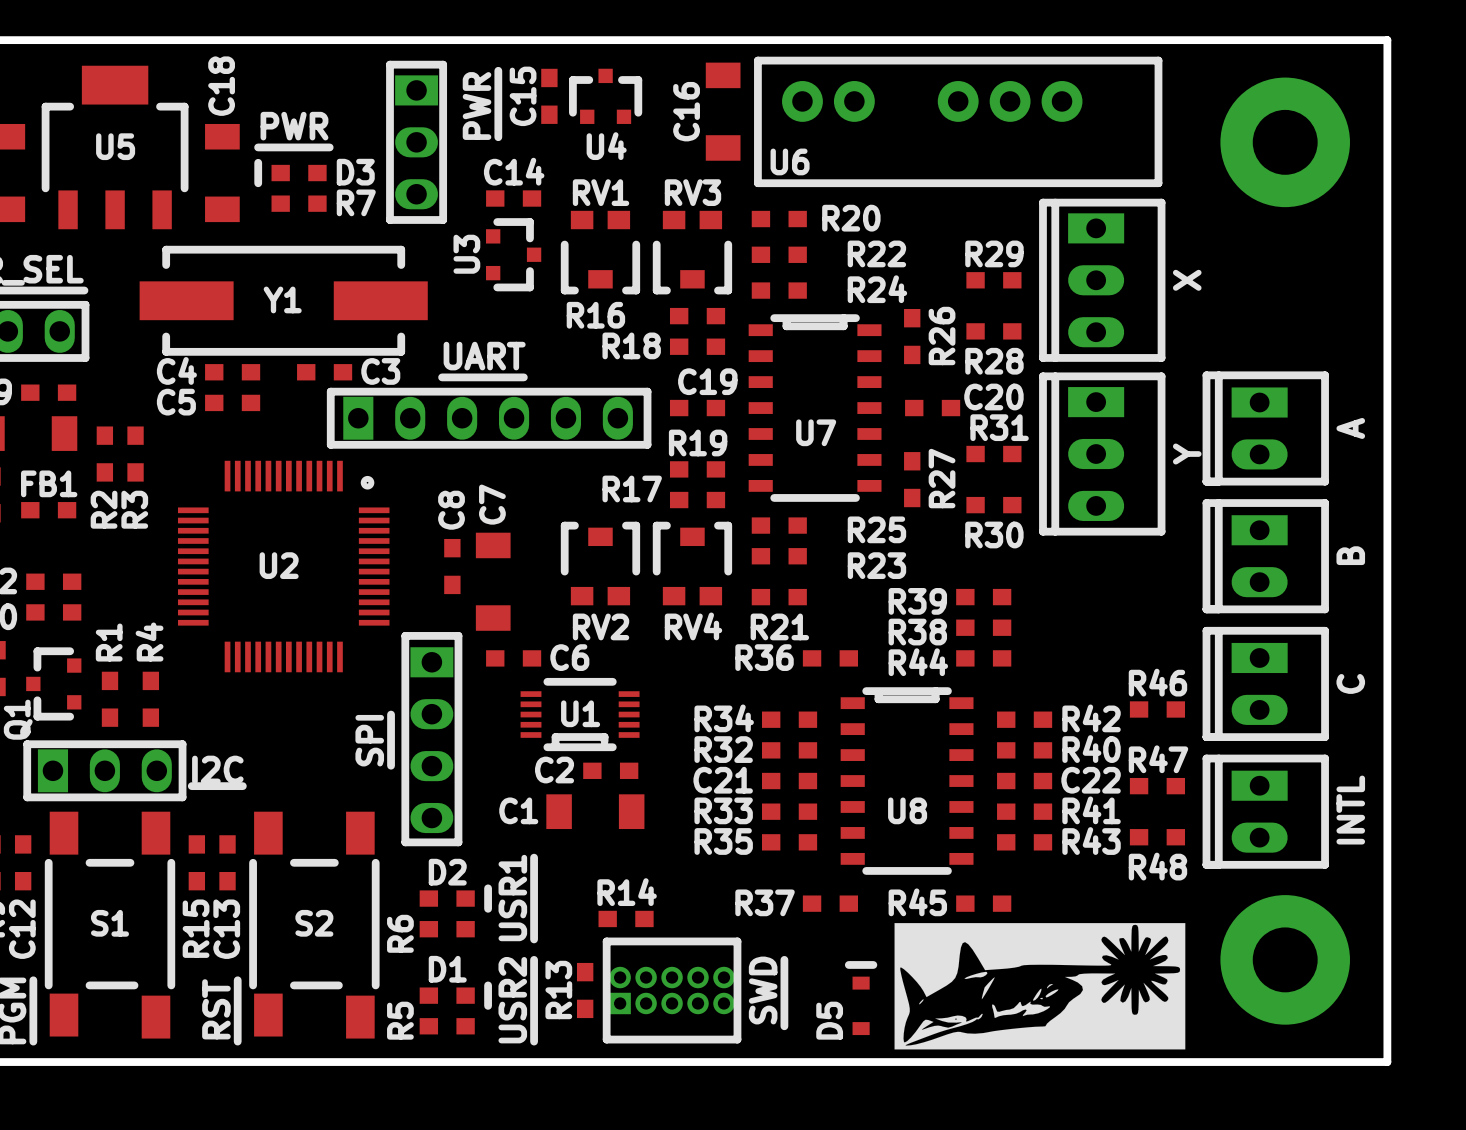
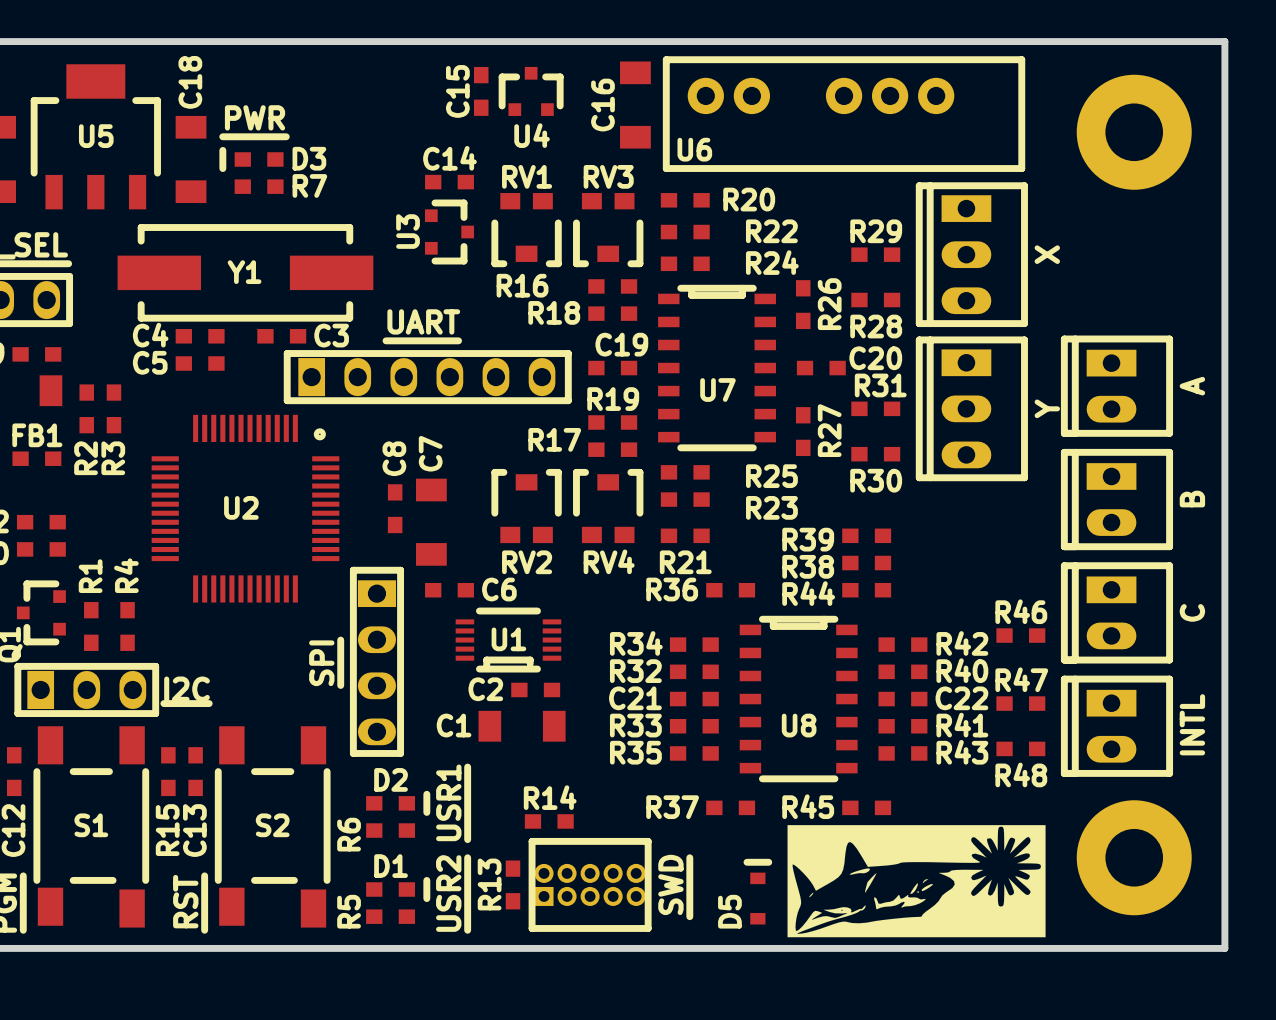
line: (498, 70) (498, 137) -> none
part: PWR (416, 142) -> none

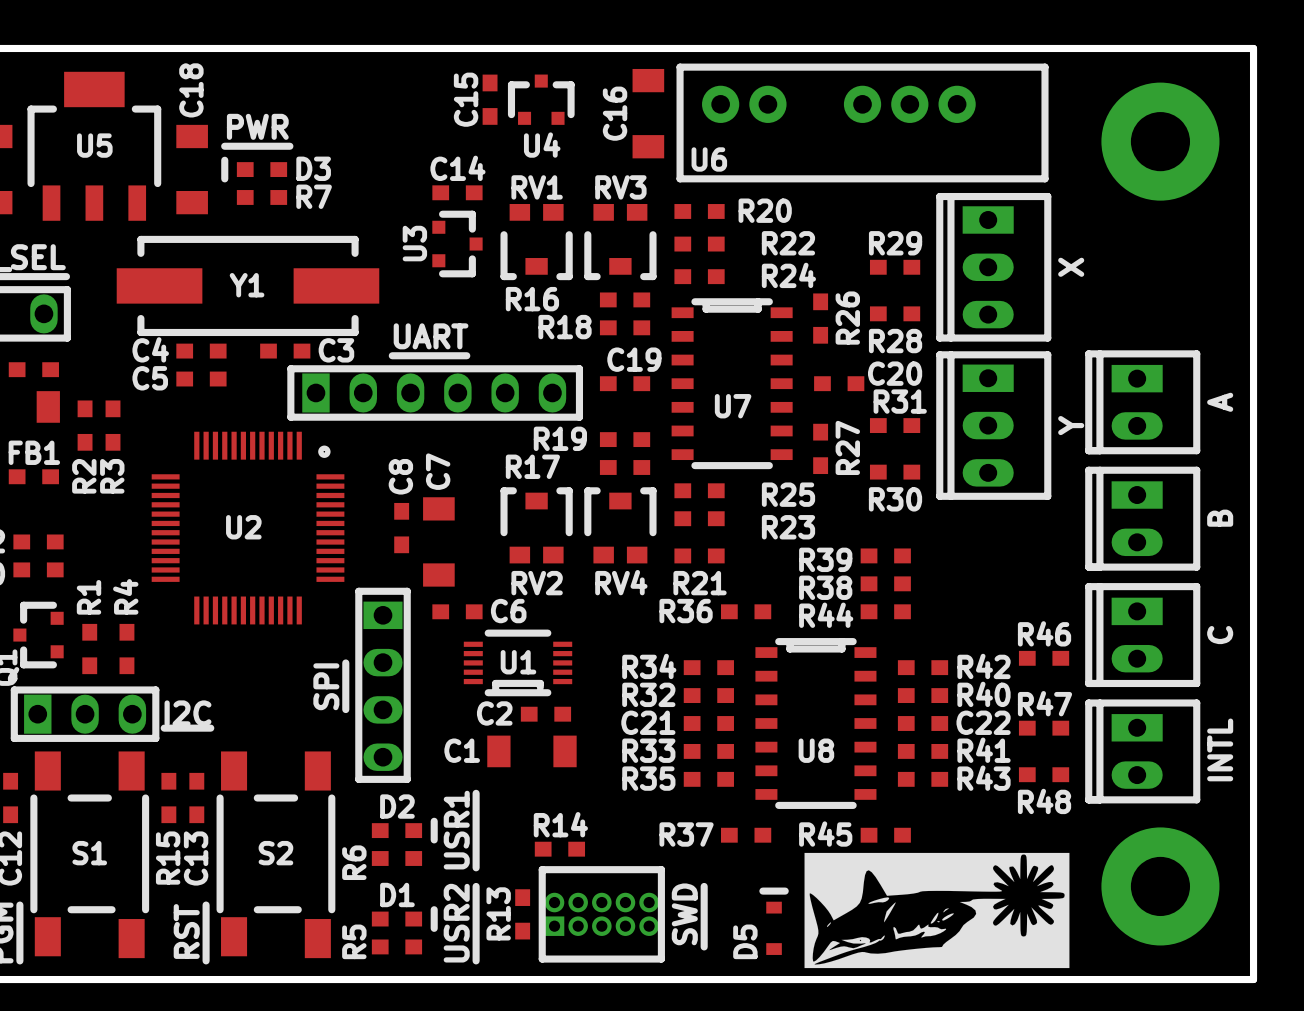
R19 name position: R19 (613, 399) -> R19 (560, 438)
R17 name position: R17 (554, 439) -> R17 (532, 466)

